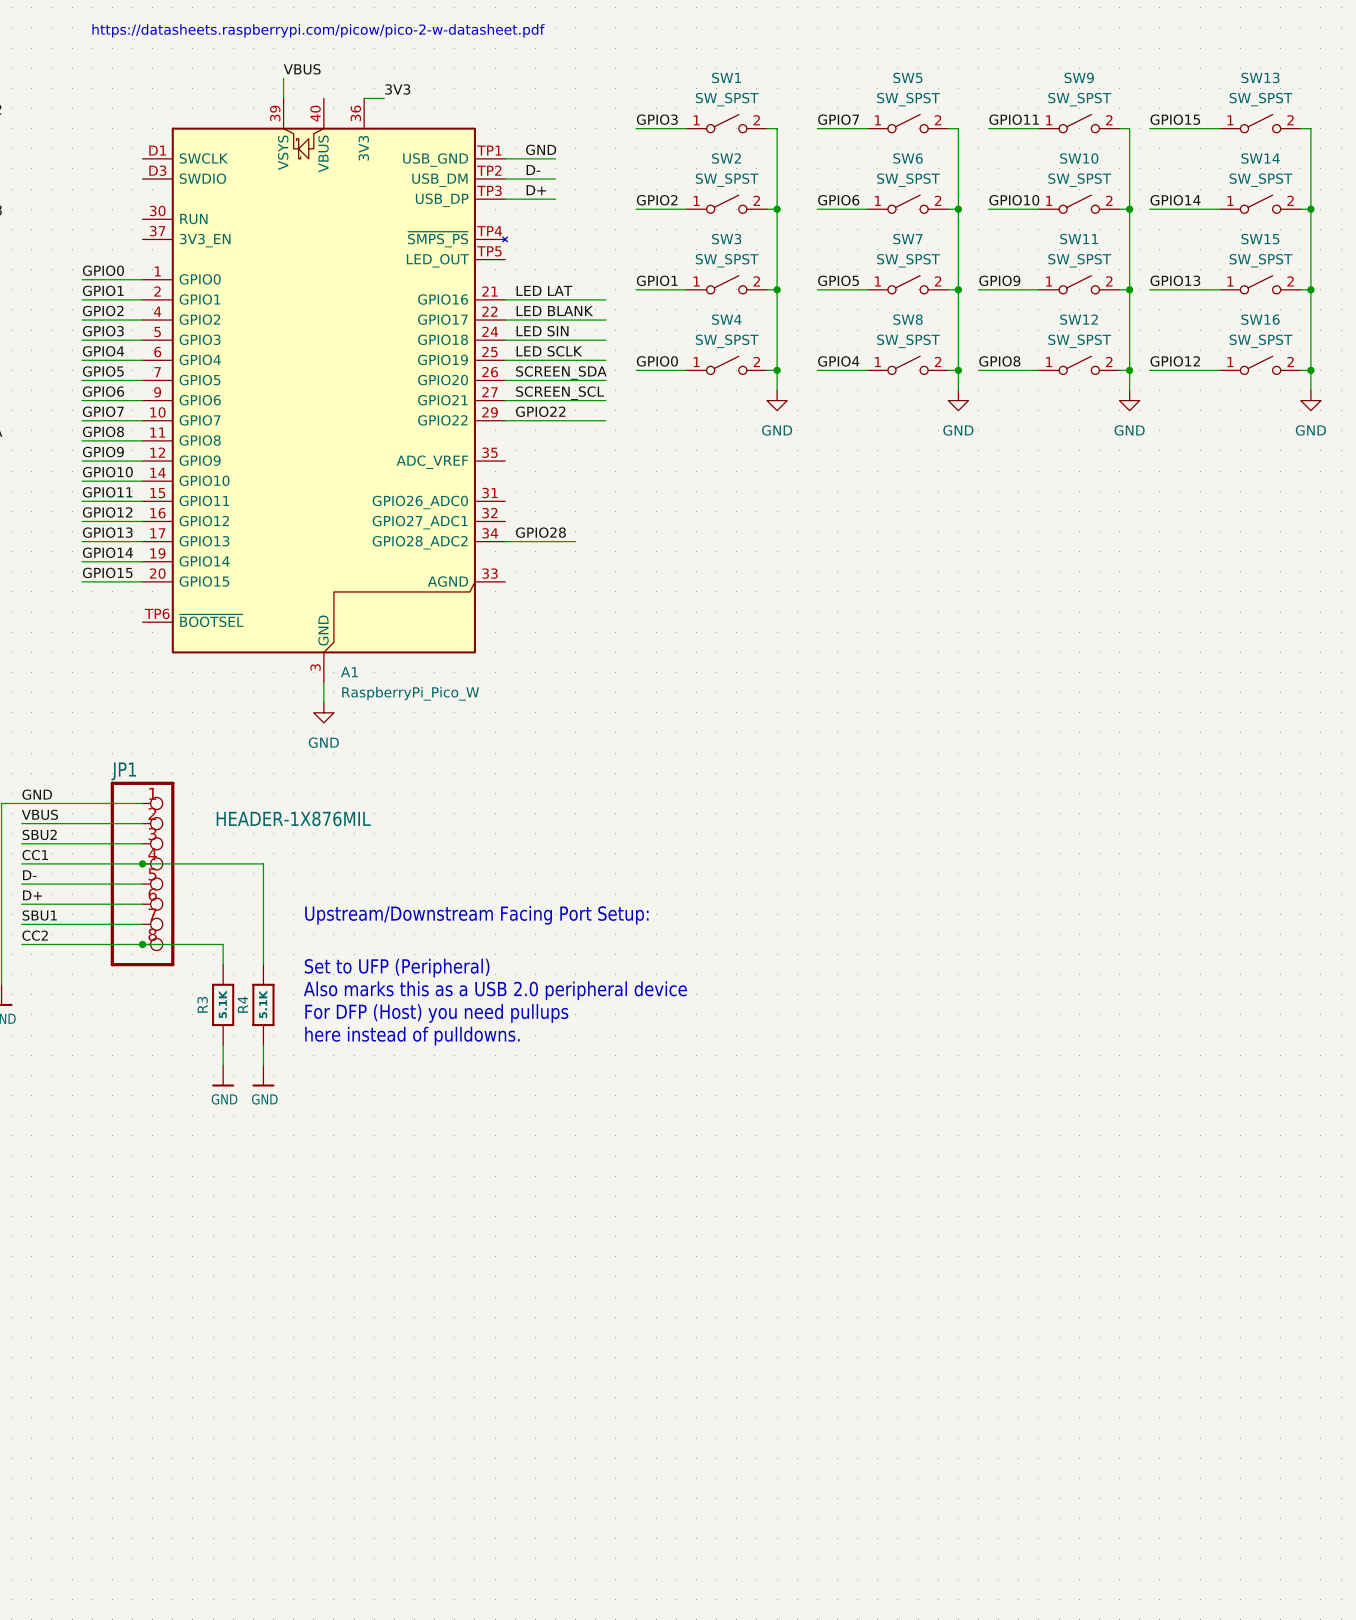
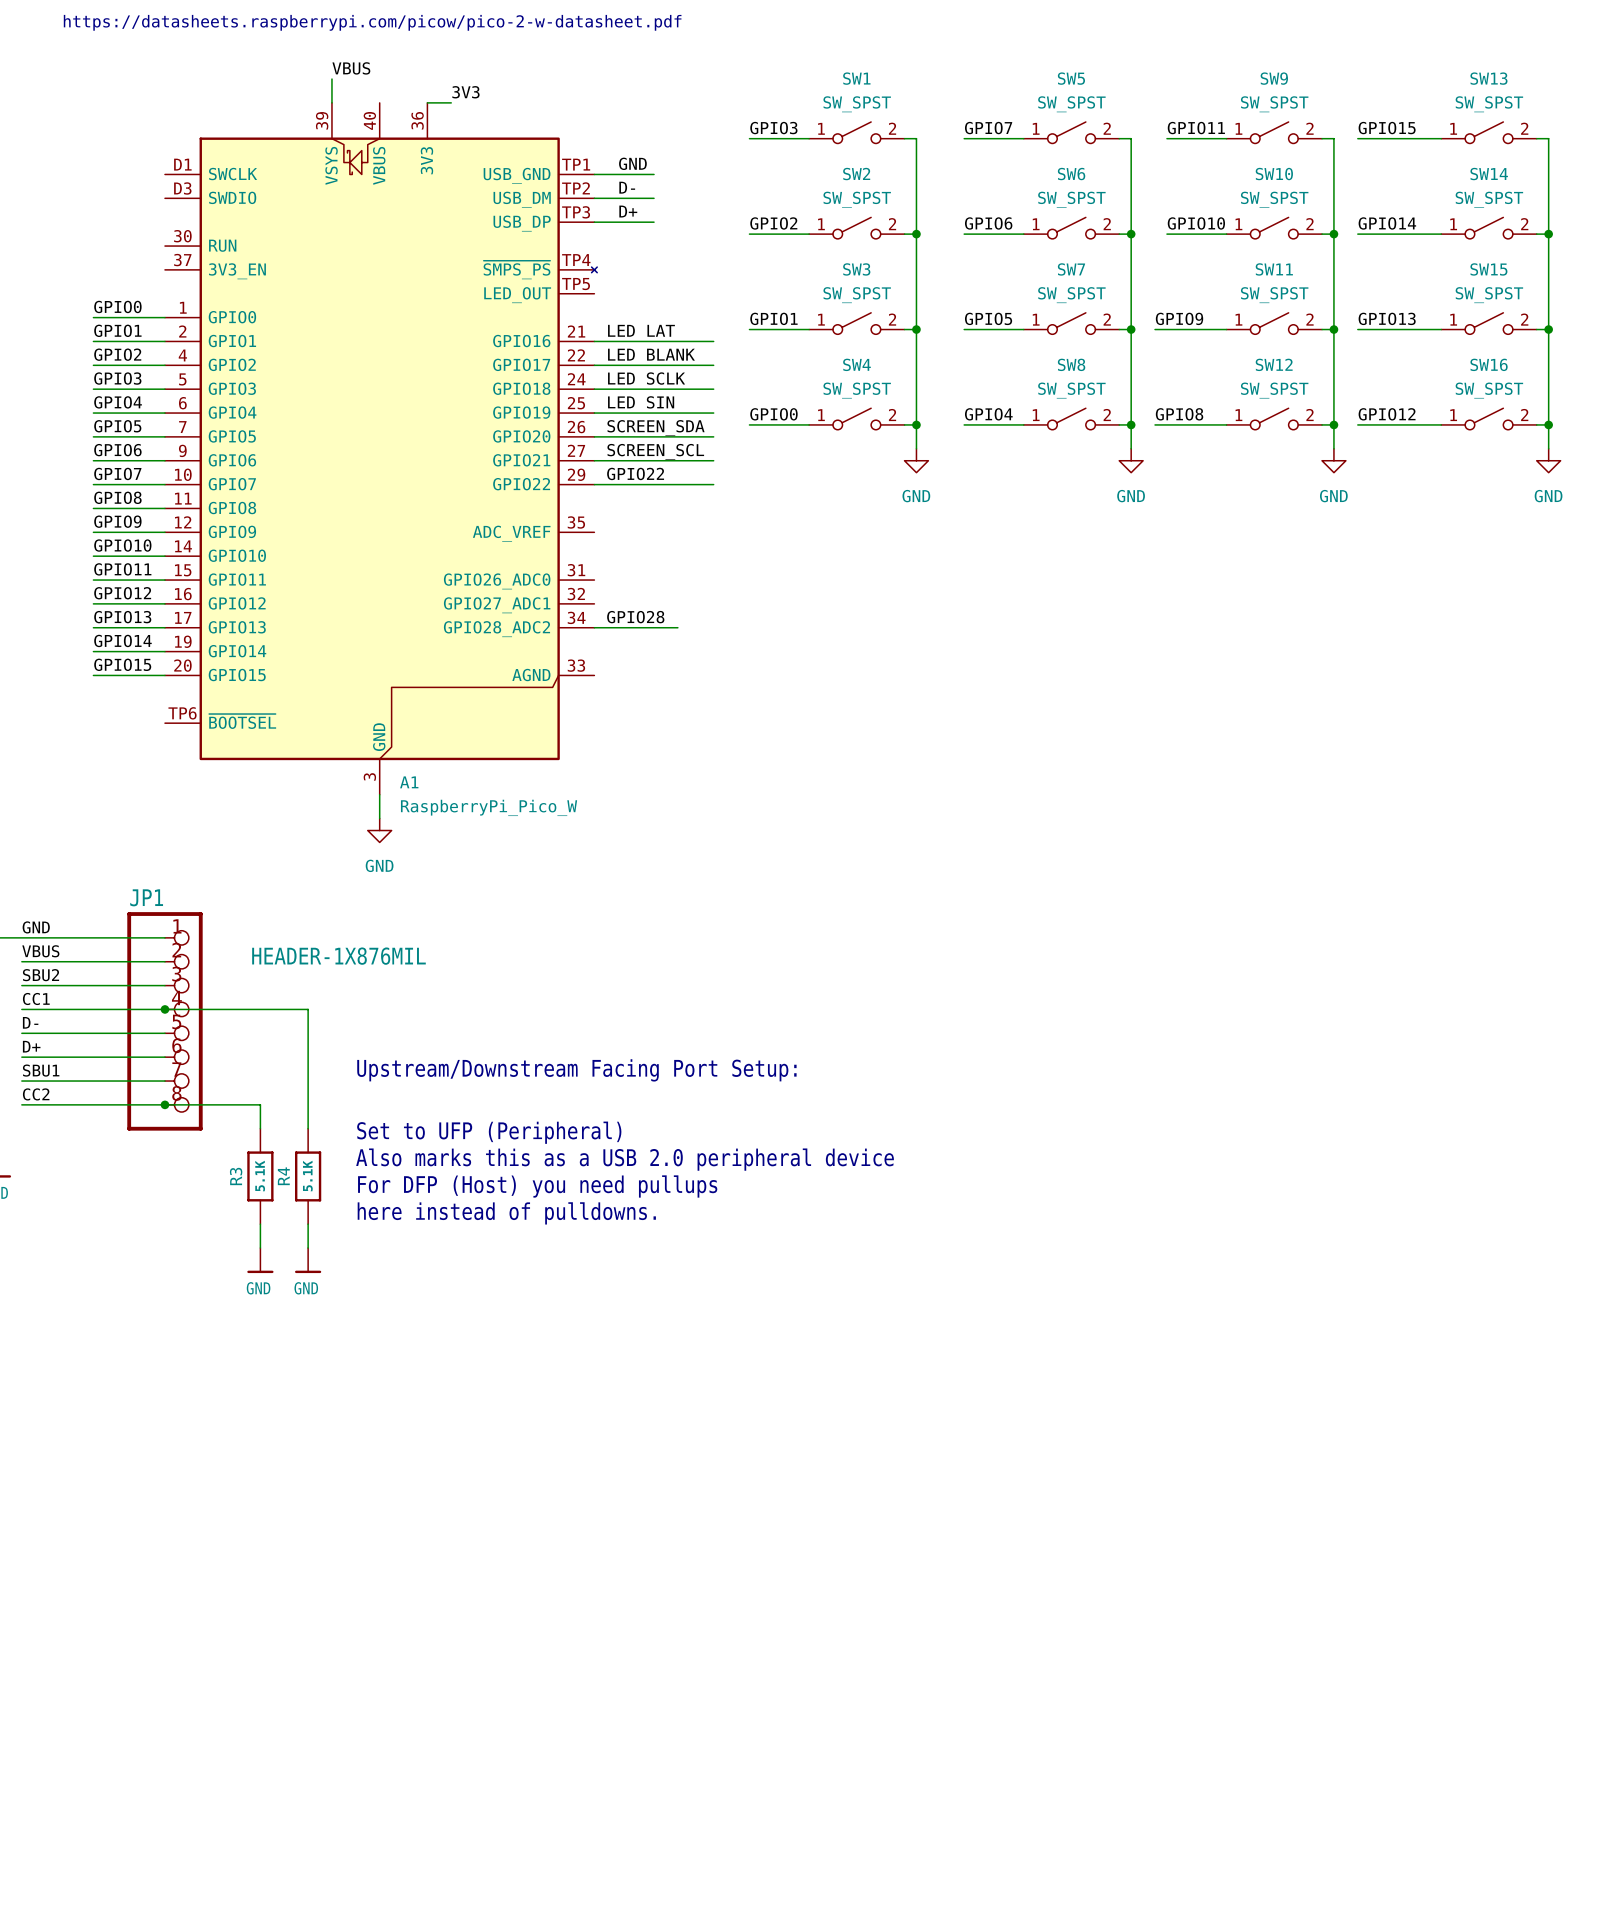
label: LED SIN (542, 331) -> LED SCLK (646, 378)
label: LED SCLK (549, 351) -> LED SIN (641, 402)

